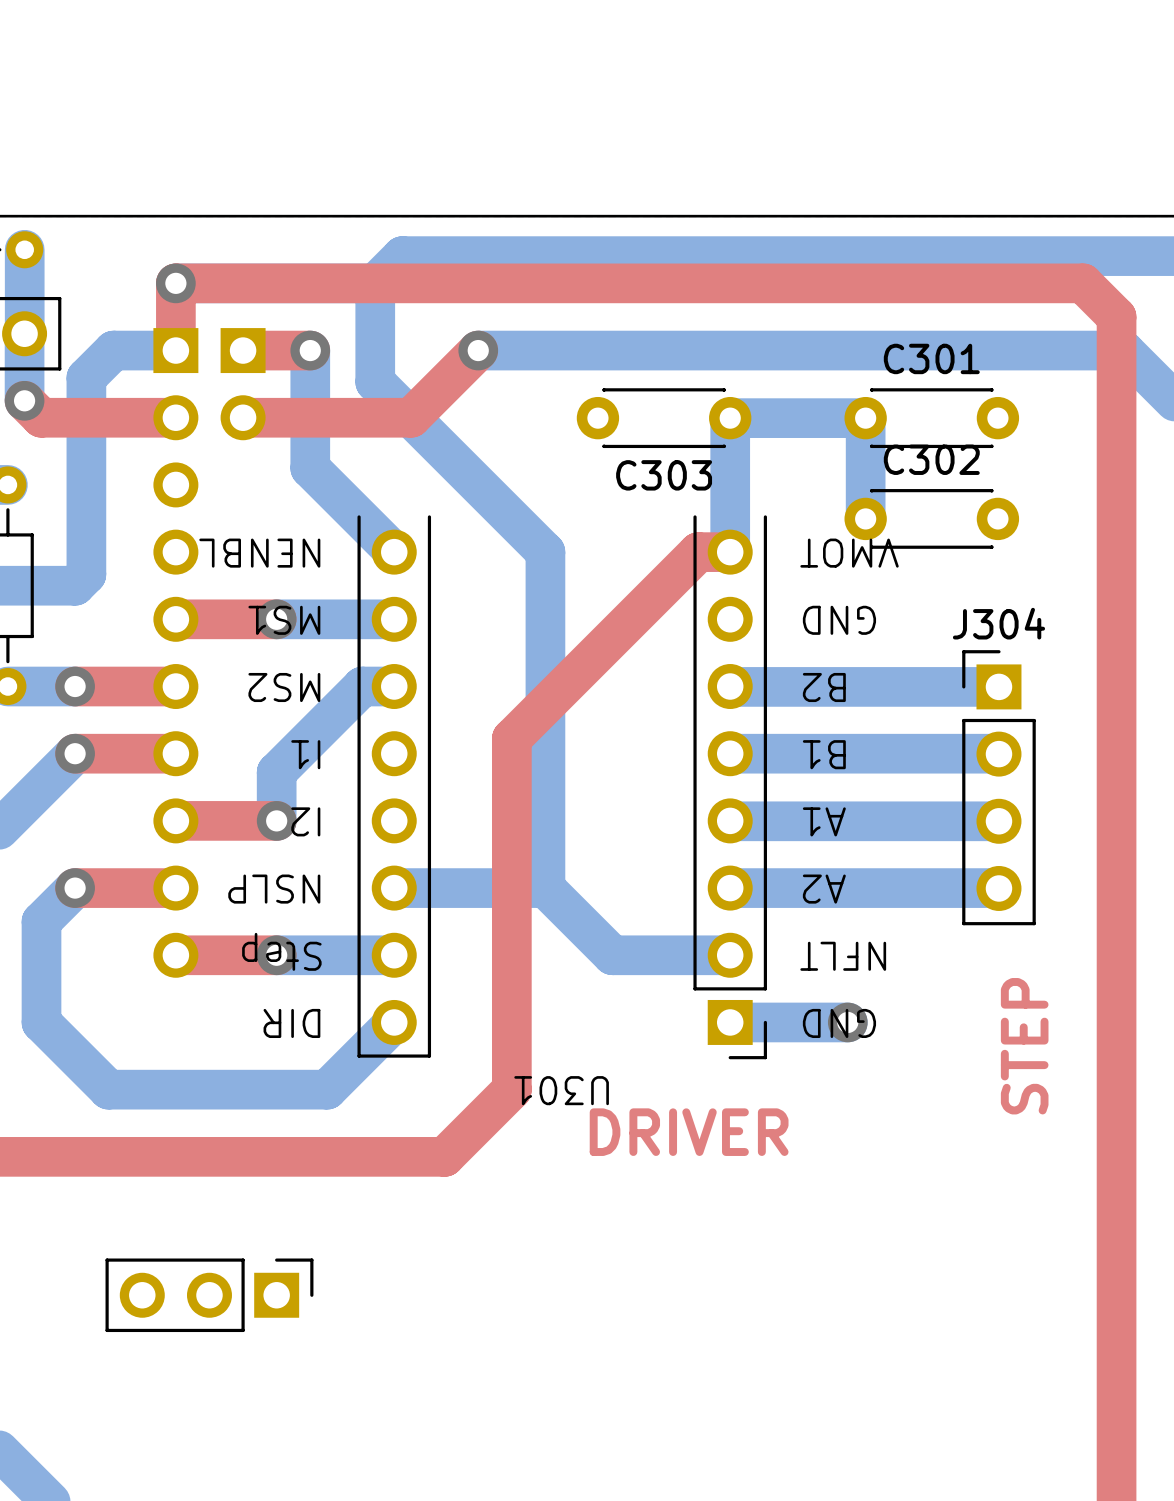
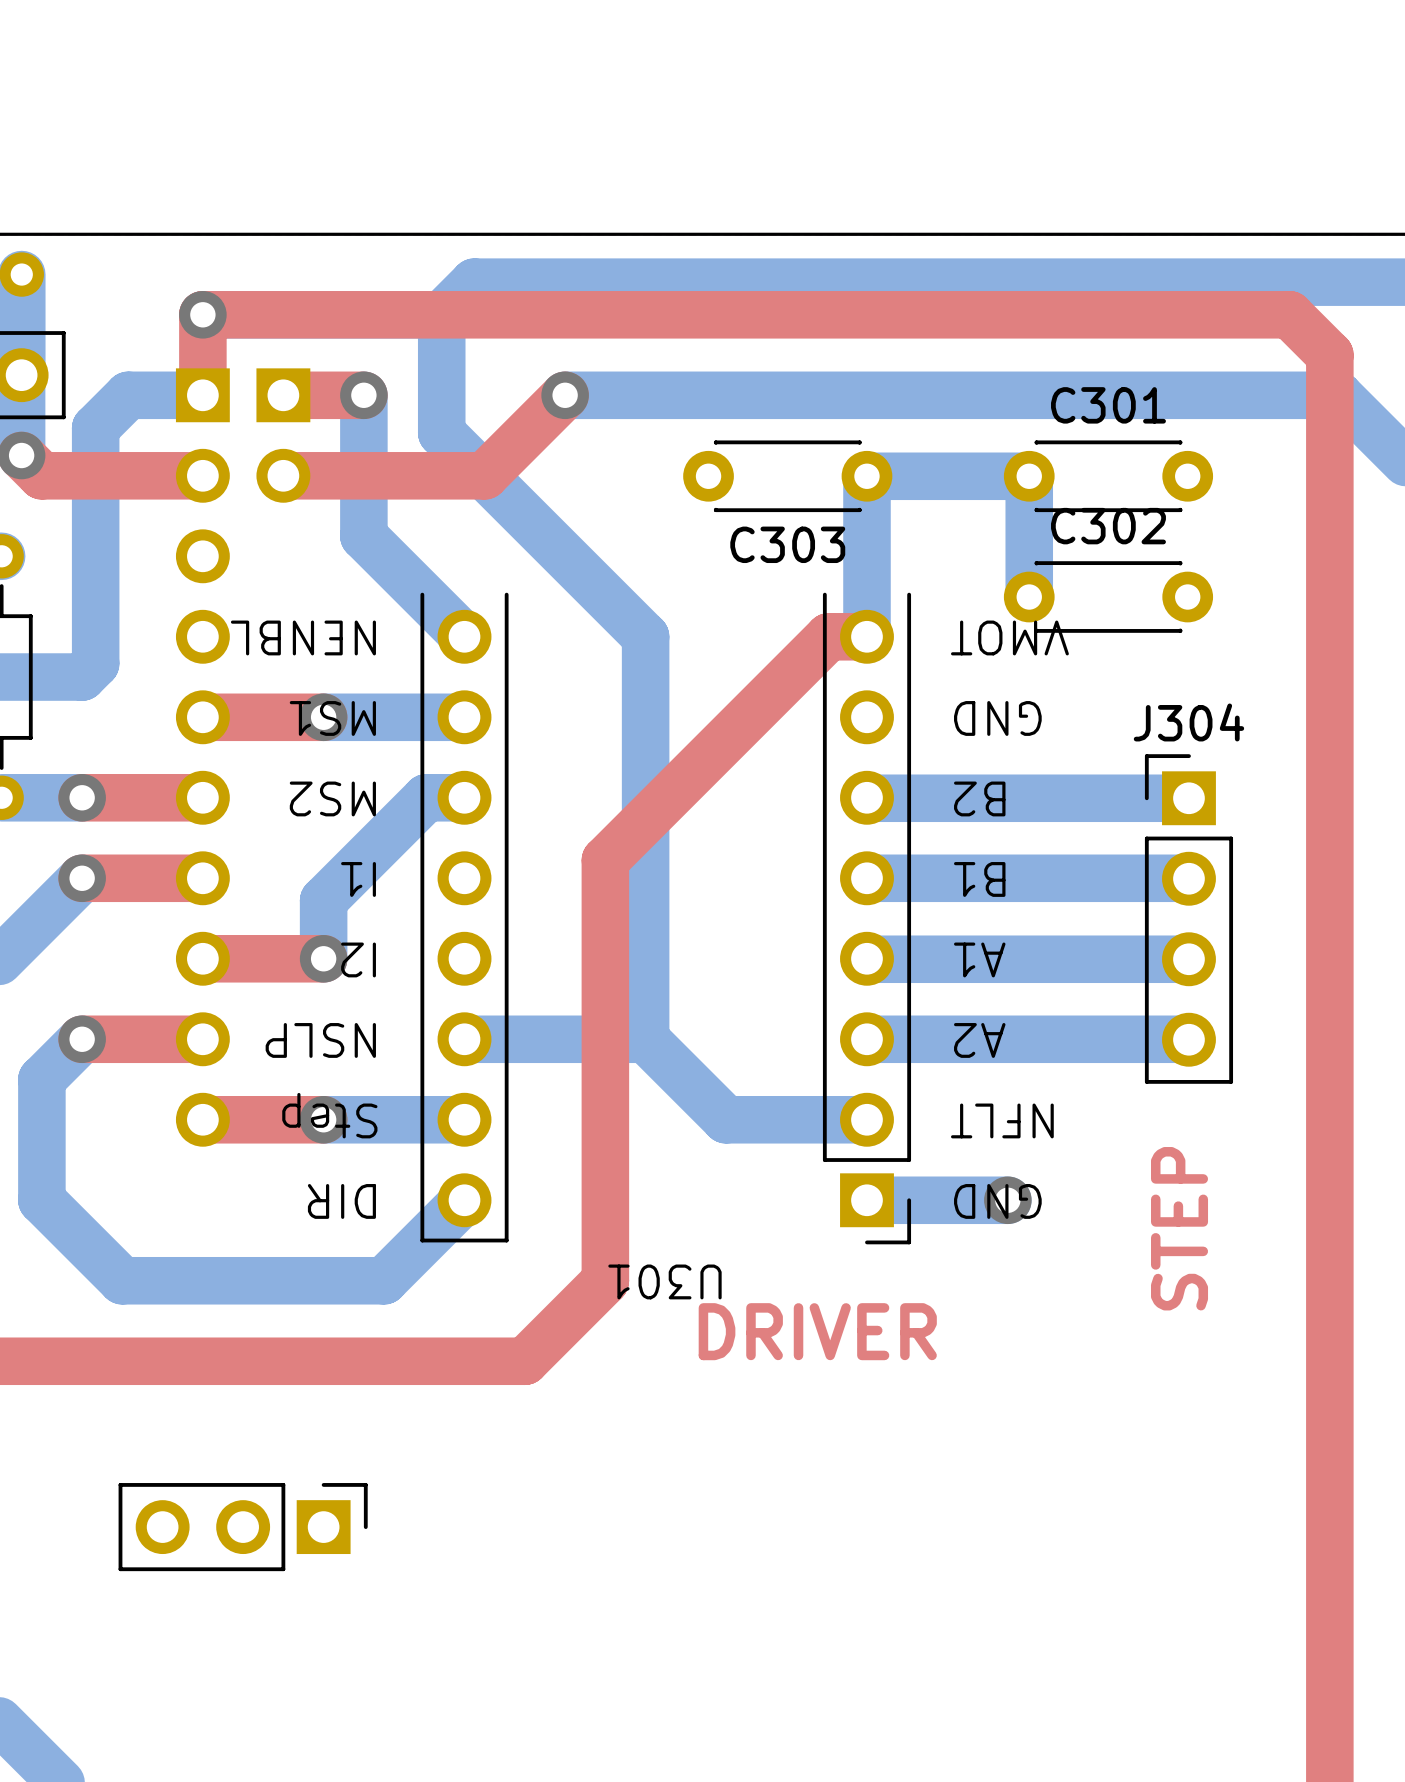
text position: STEP (1024, 1046) -> STEP (1179, 1228)

